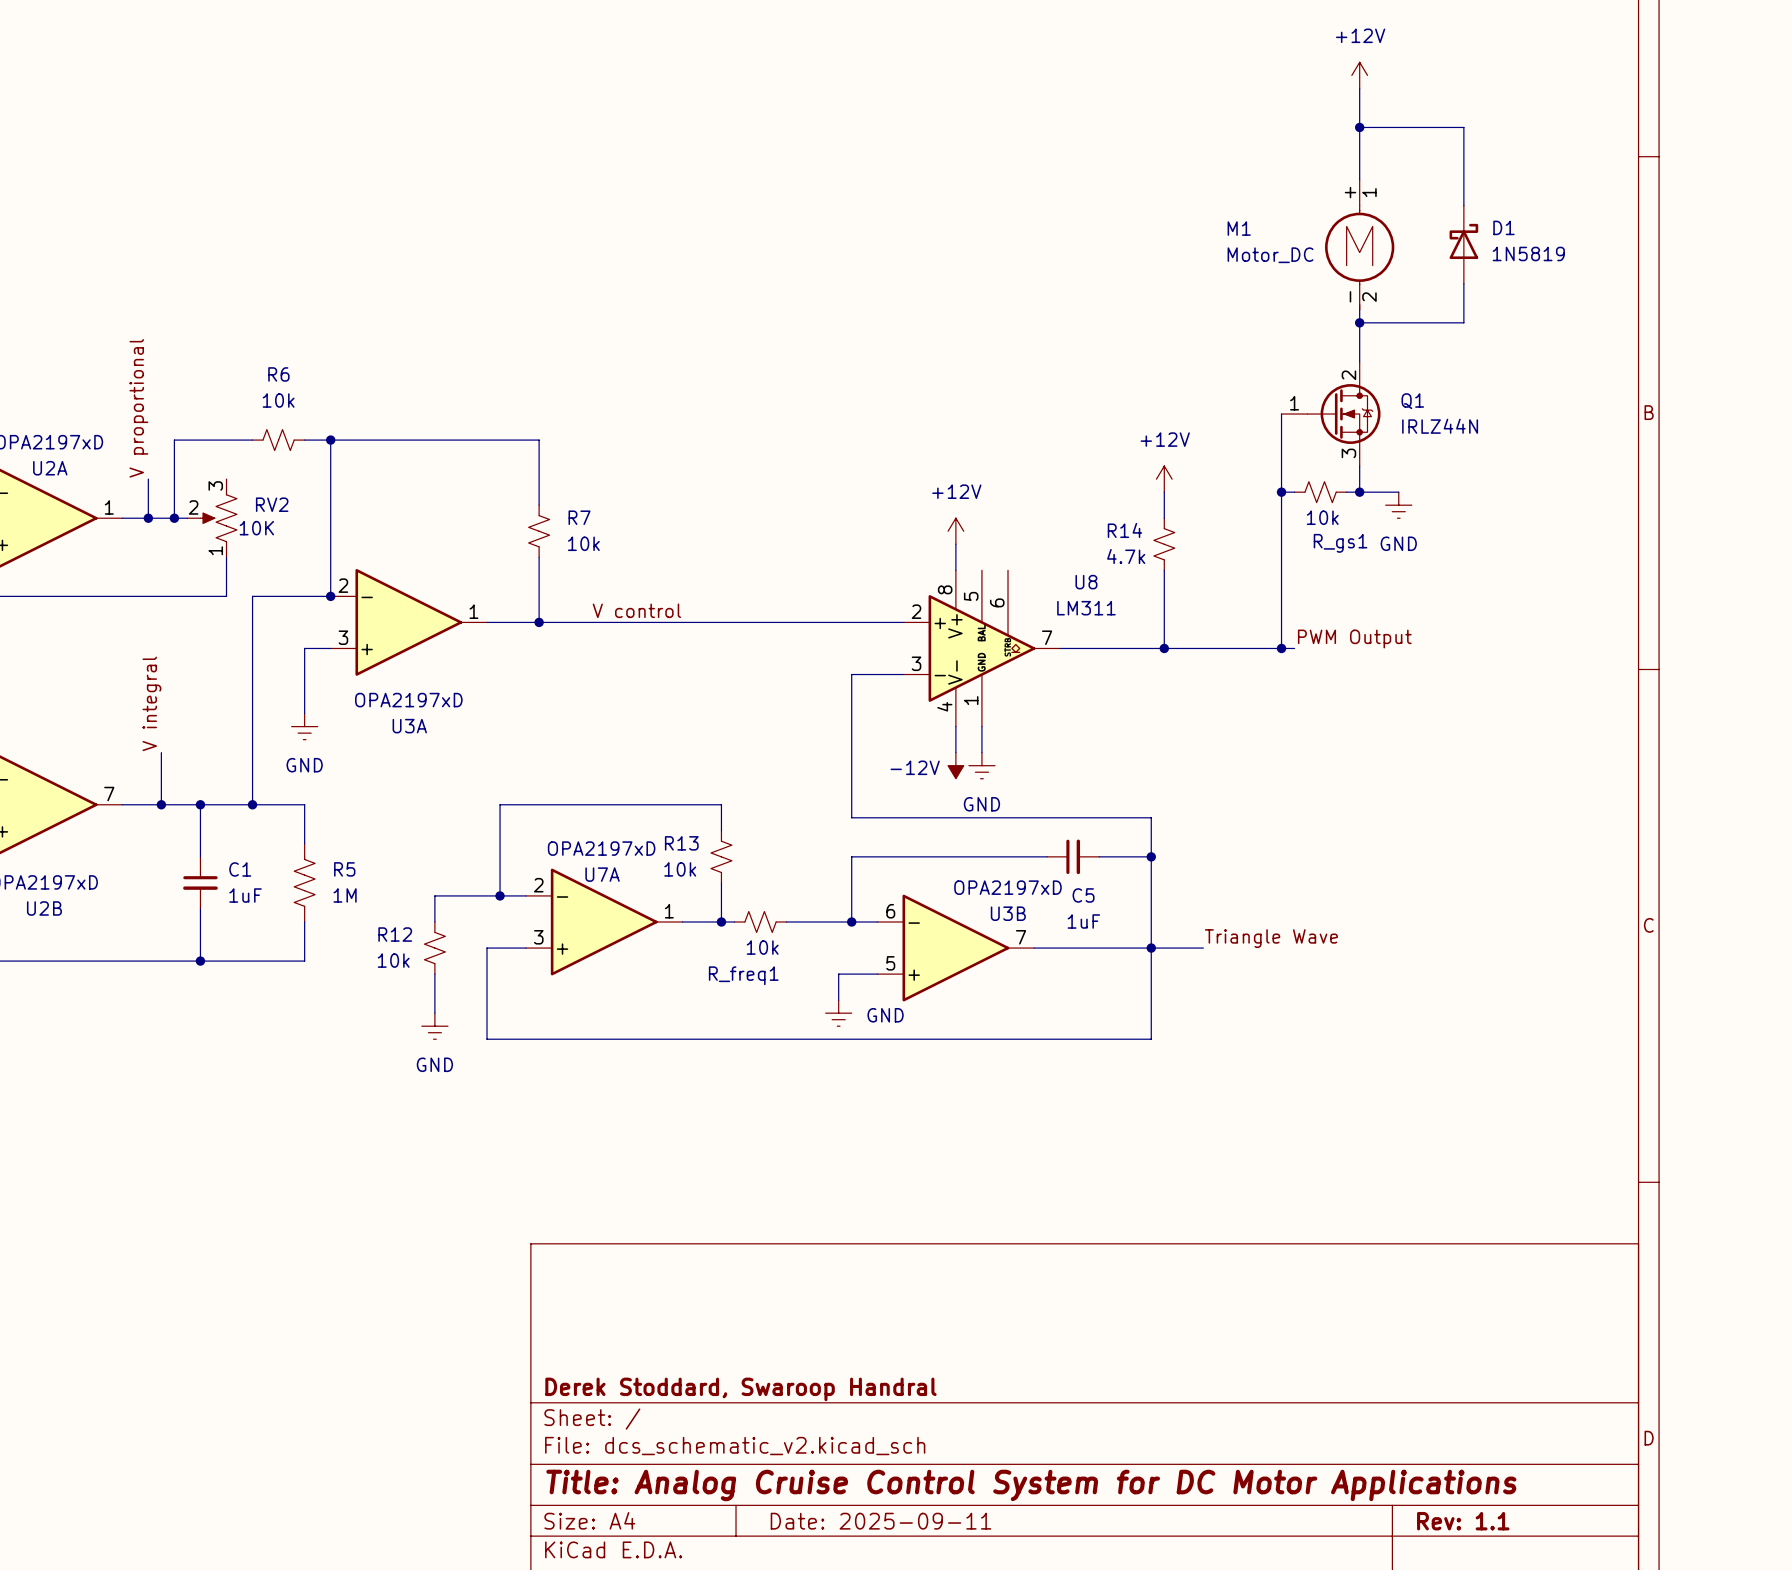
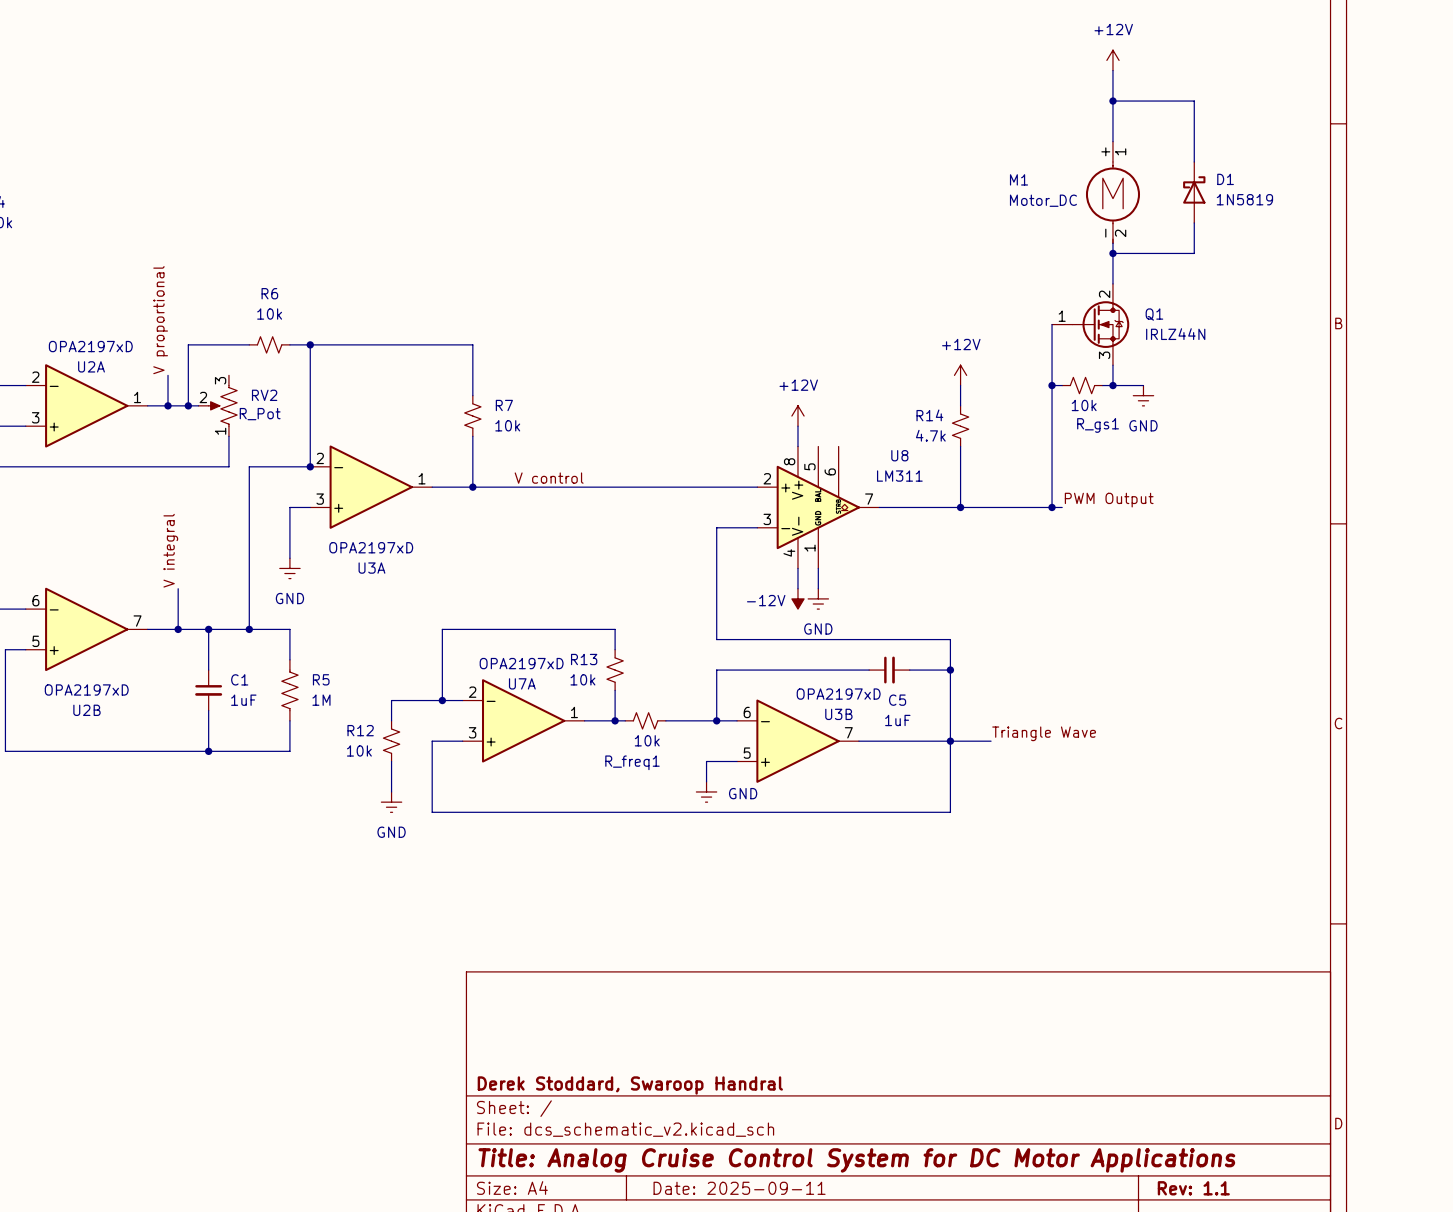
RV2 value: 10K (256, 528) -> R_Pot (260, 414)

